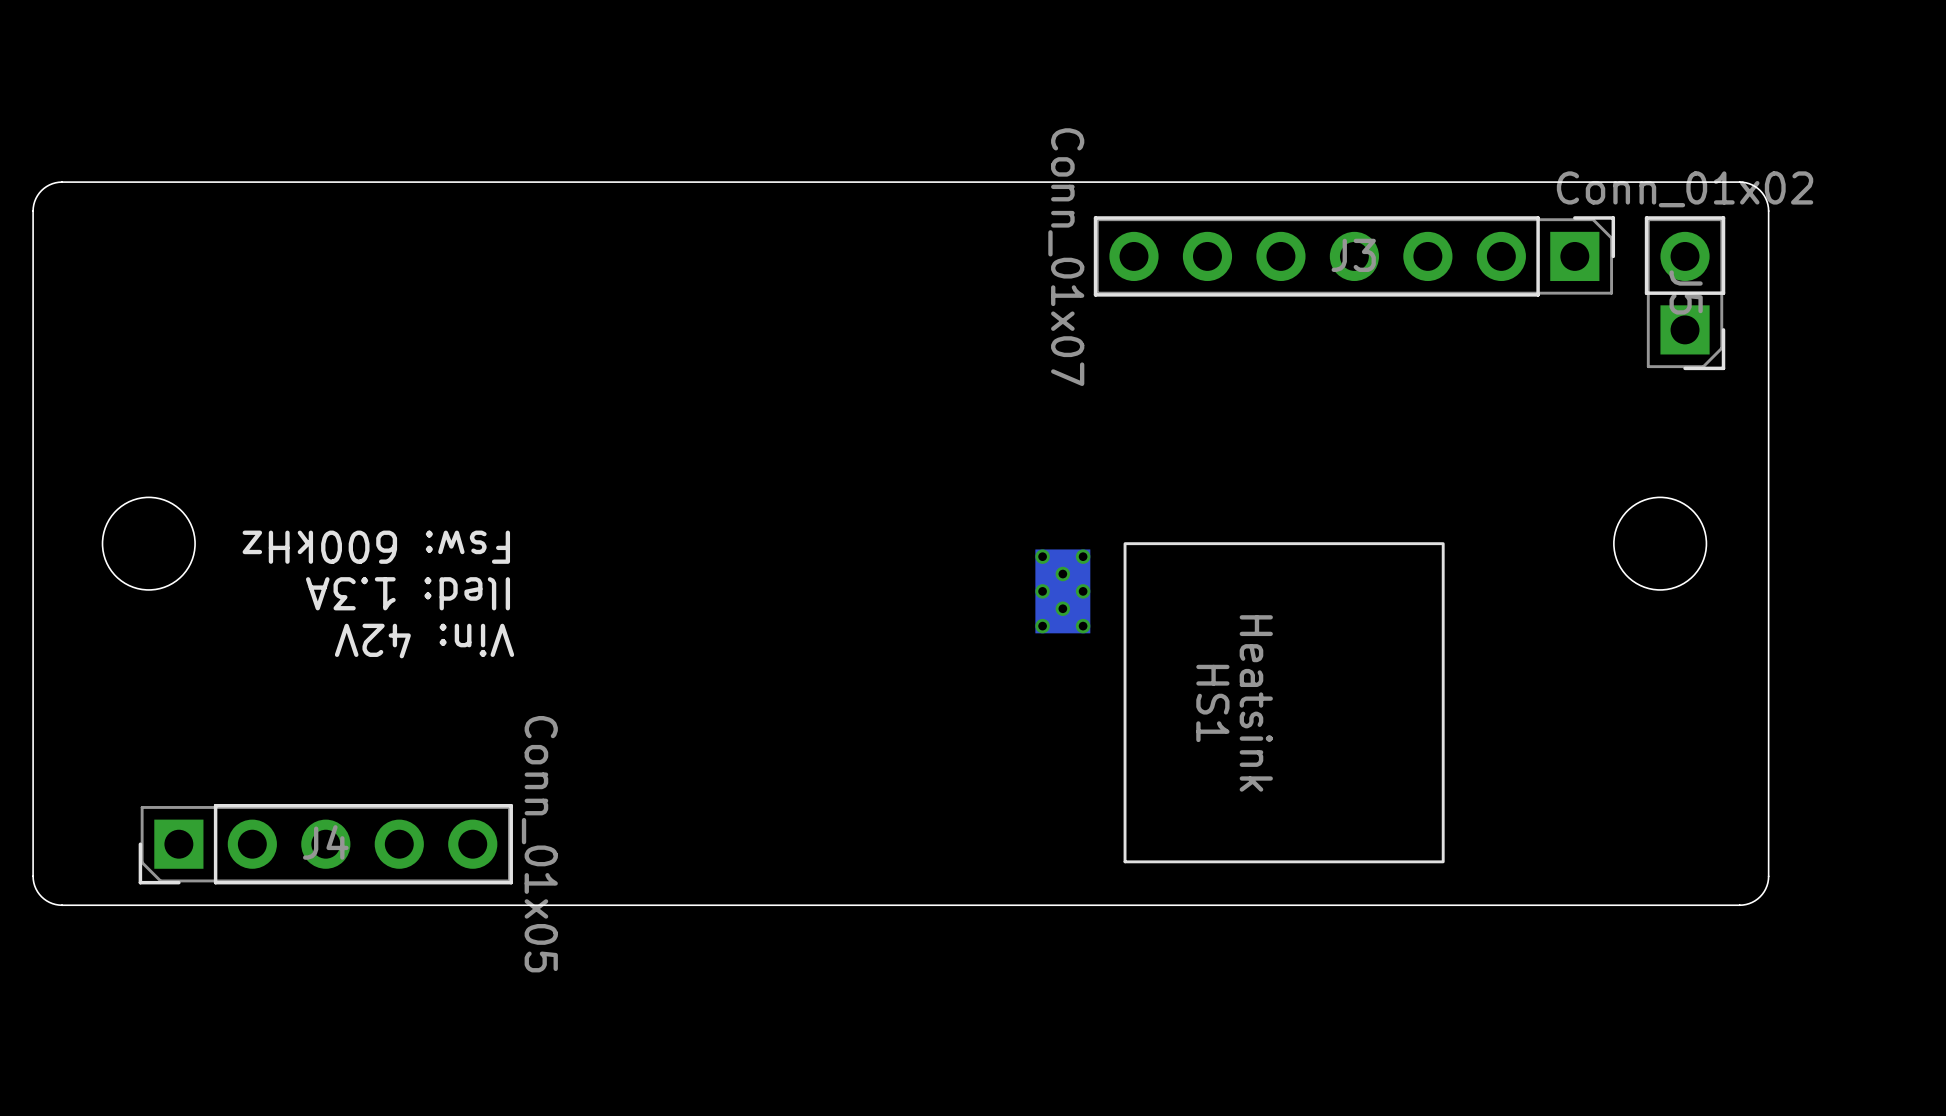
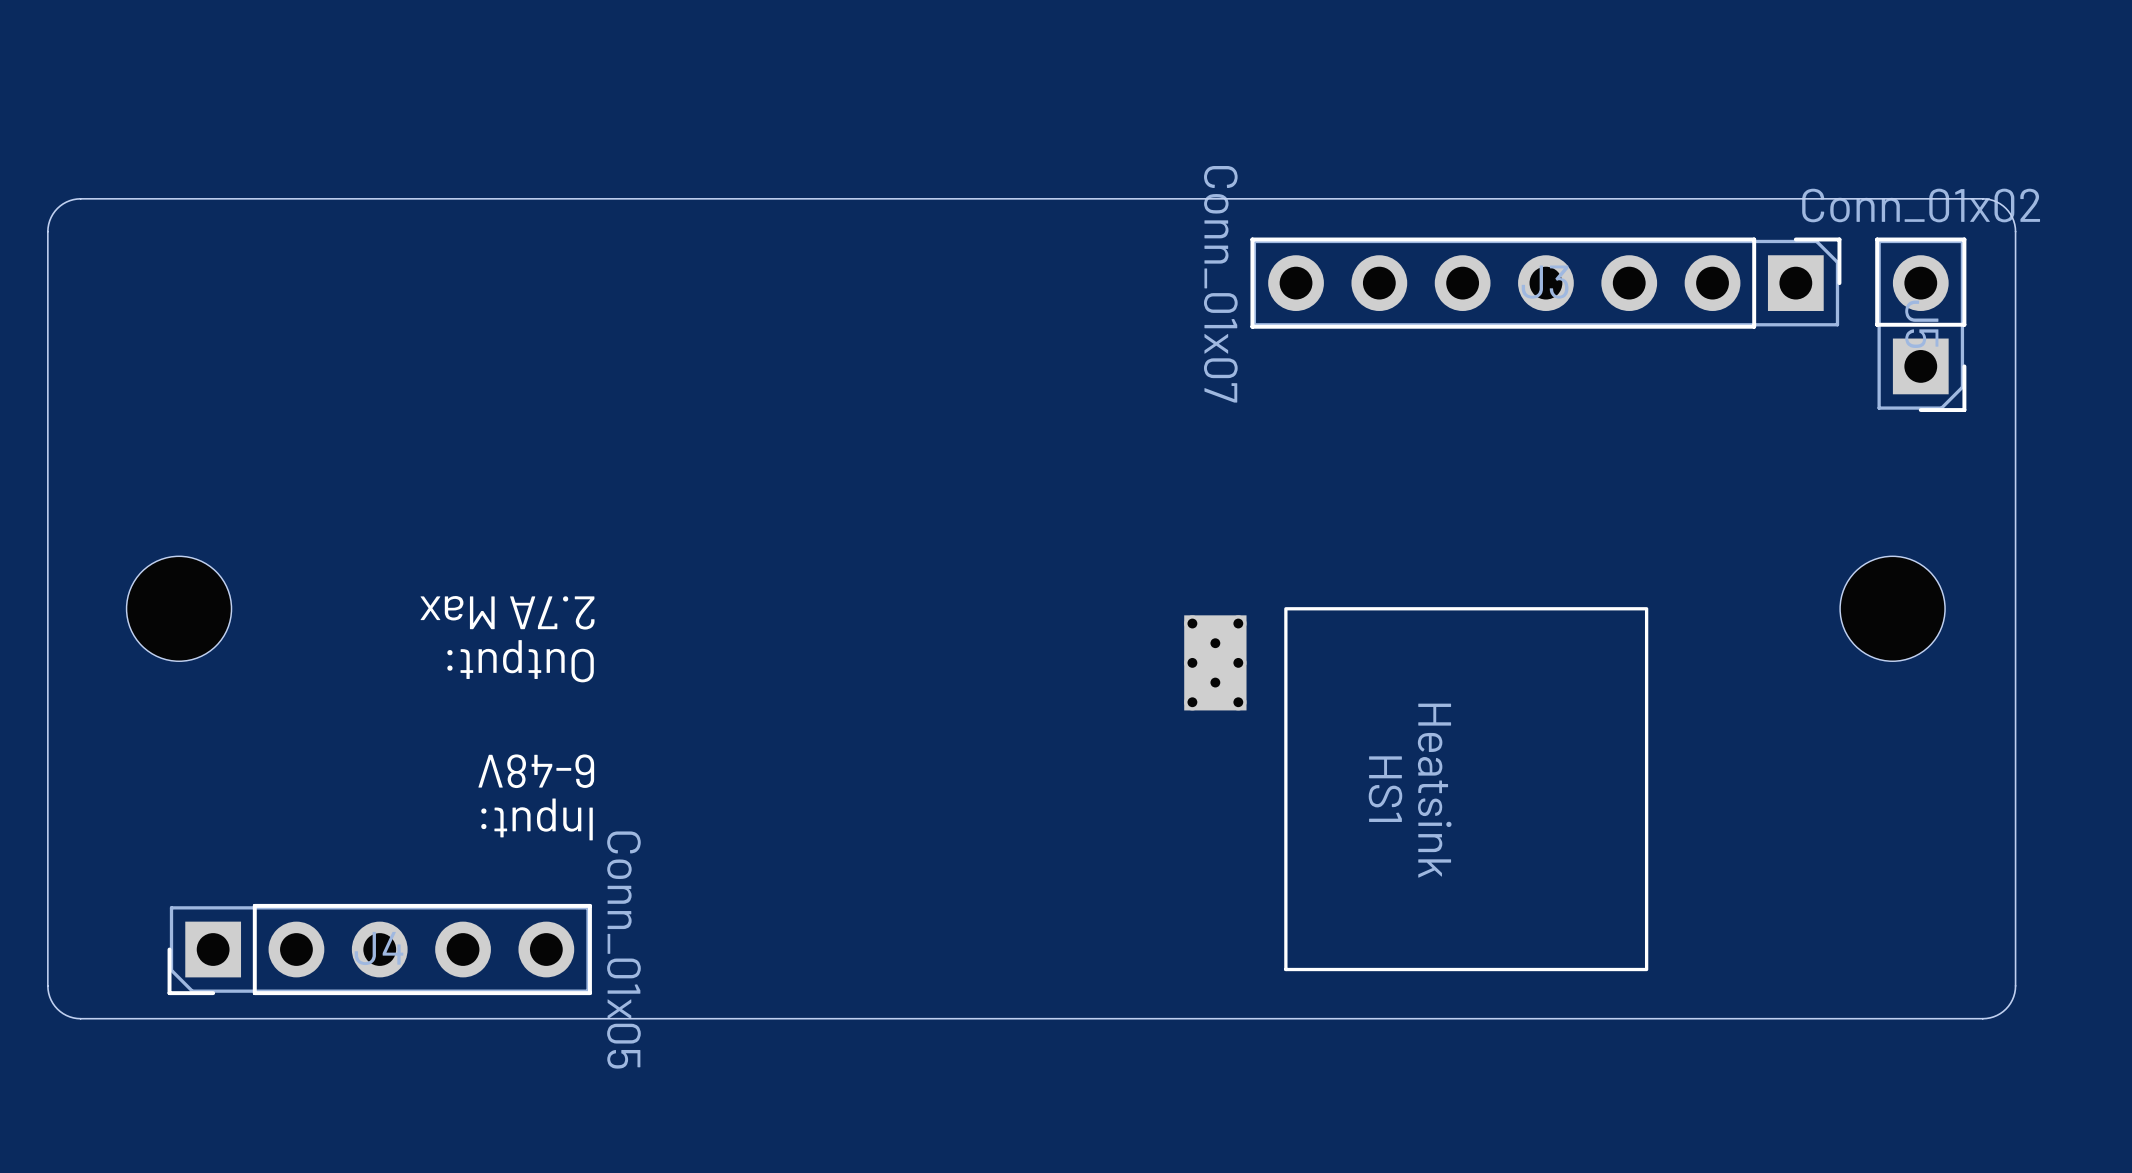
text: Fsw: 600kHz (376, 547) -> 2.7A Max (507, 612)
text: Iled: 1.3A (407, 593) -> Output: (520, 661)
text: Vin: 42V (424, 641) -> none
text: none -> 6-48V (536, 771)
text: none -> Input: (537, 819)

